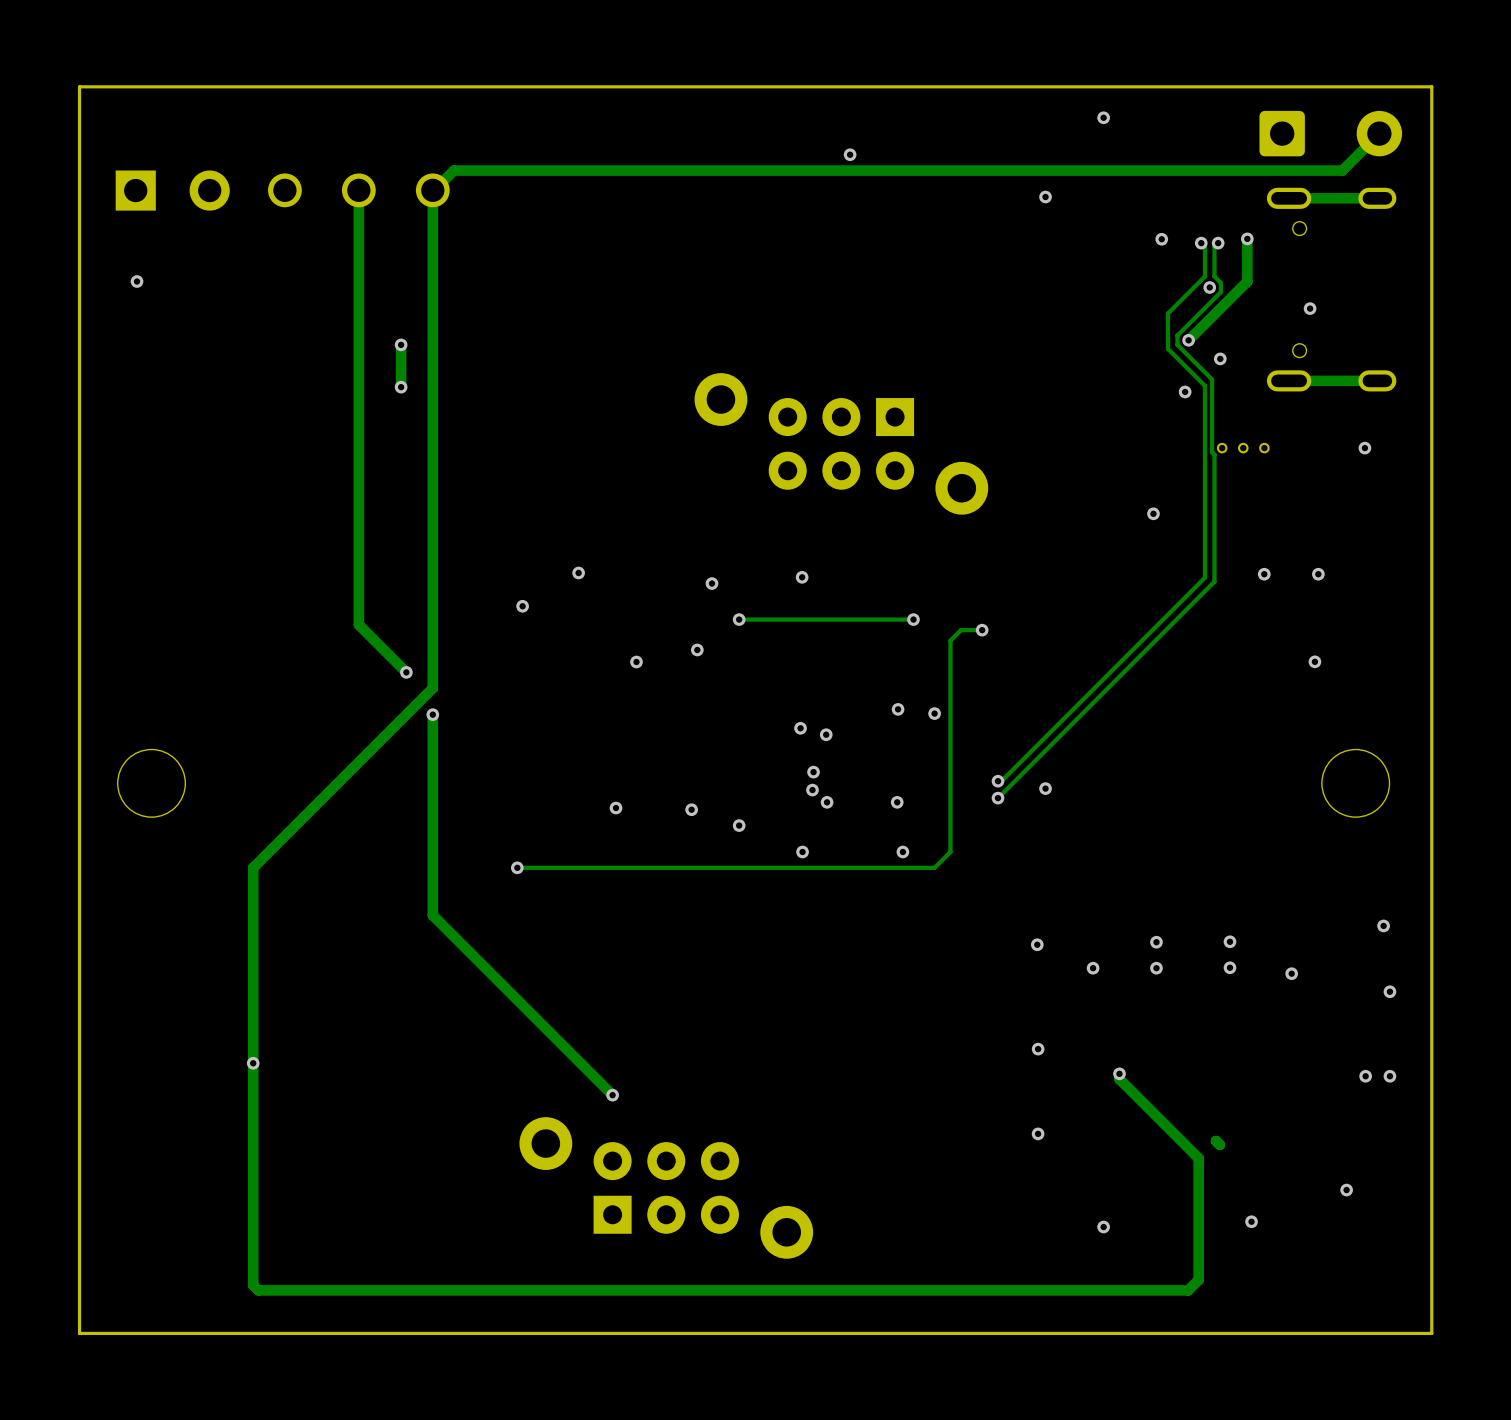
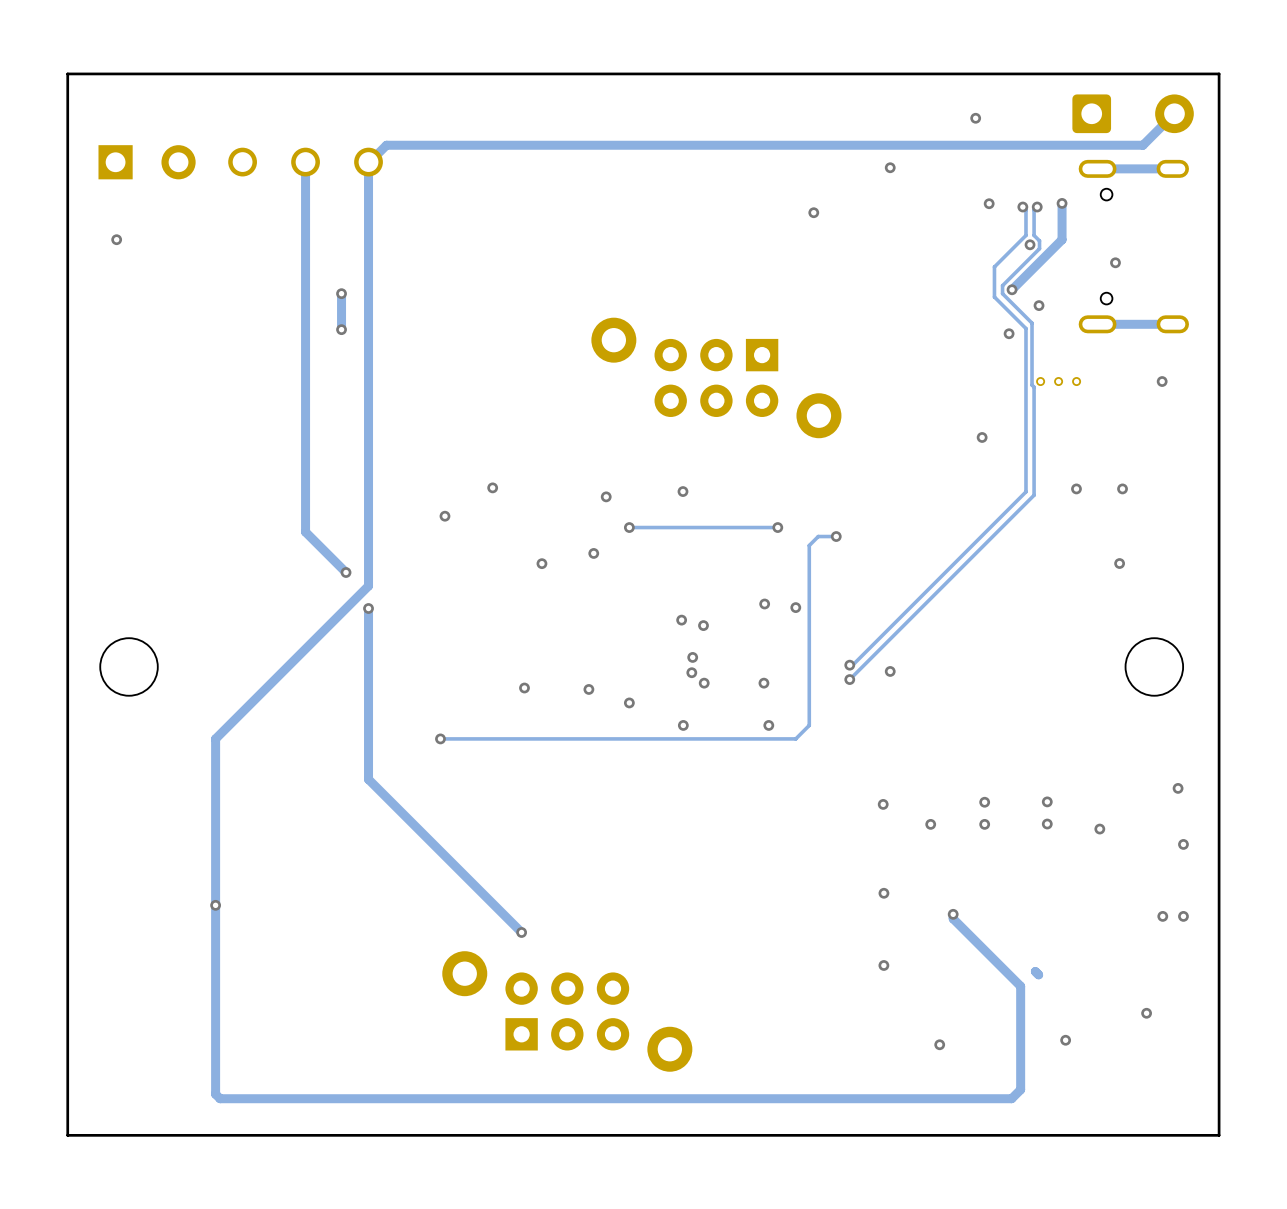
via position: (1103, 117) -> (975, 118)
via: (850, 154) -> none
via: none -> (813, 212)

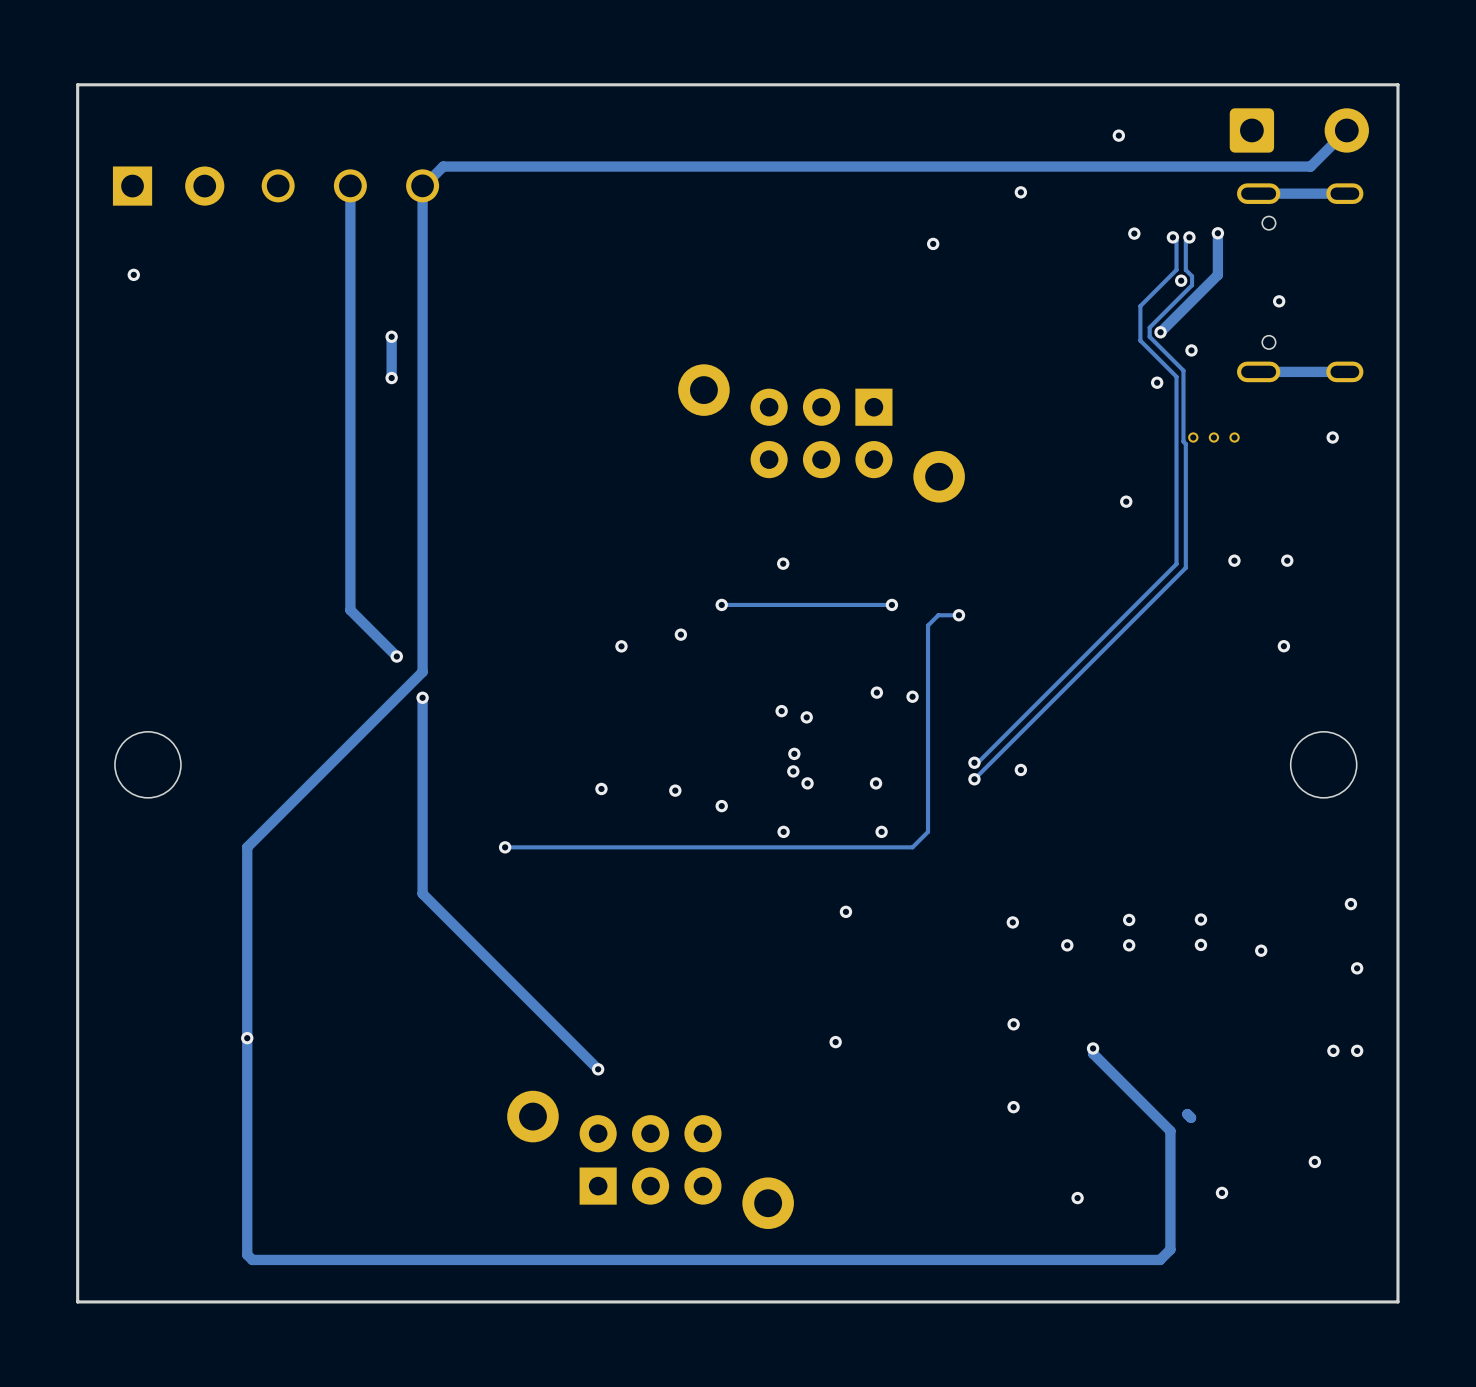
via: (492, 487) -> none
via: (606, 496) -> none
via: (444, 516) -> none
via: none -> (845, 911)
via: none -> (835, 1042)

